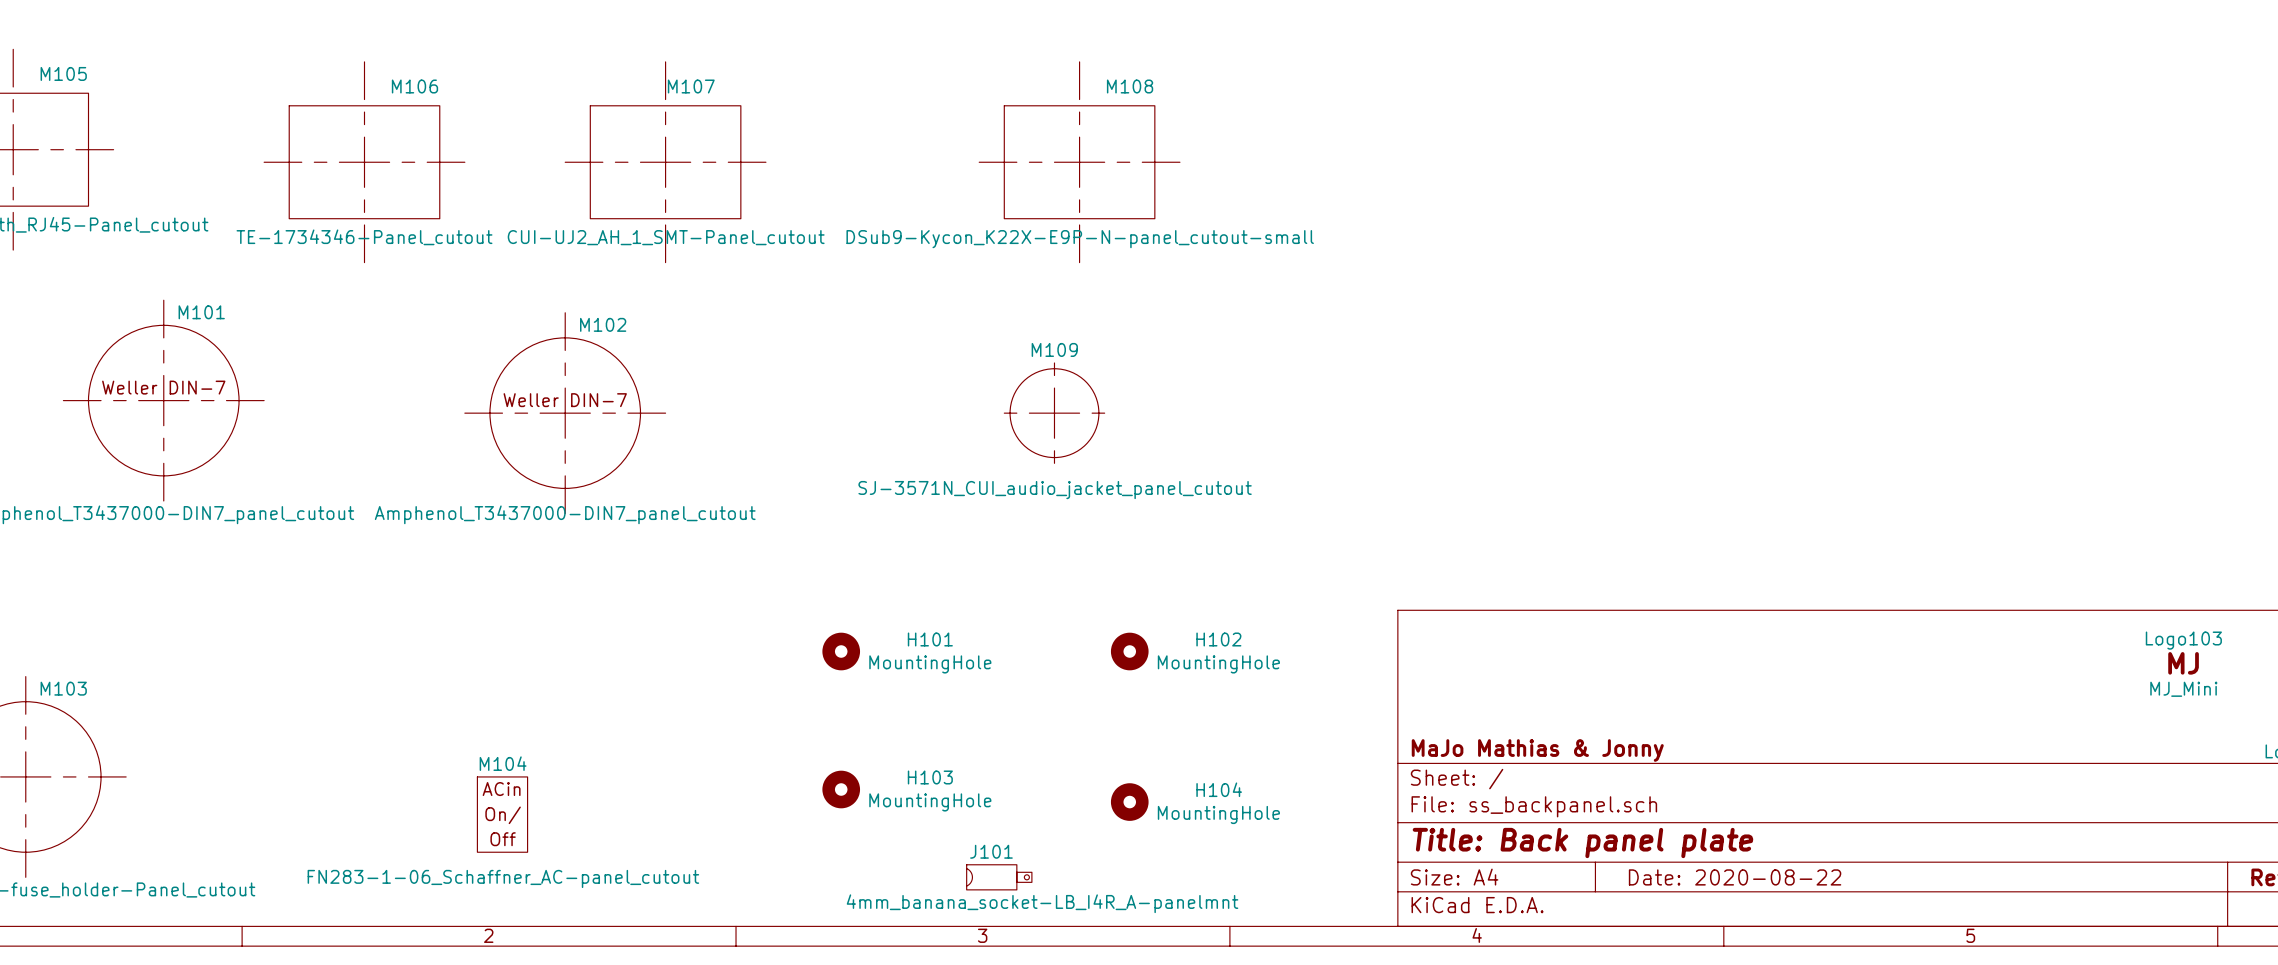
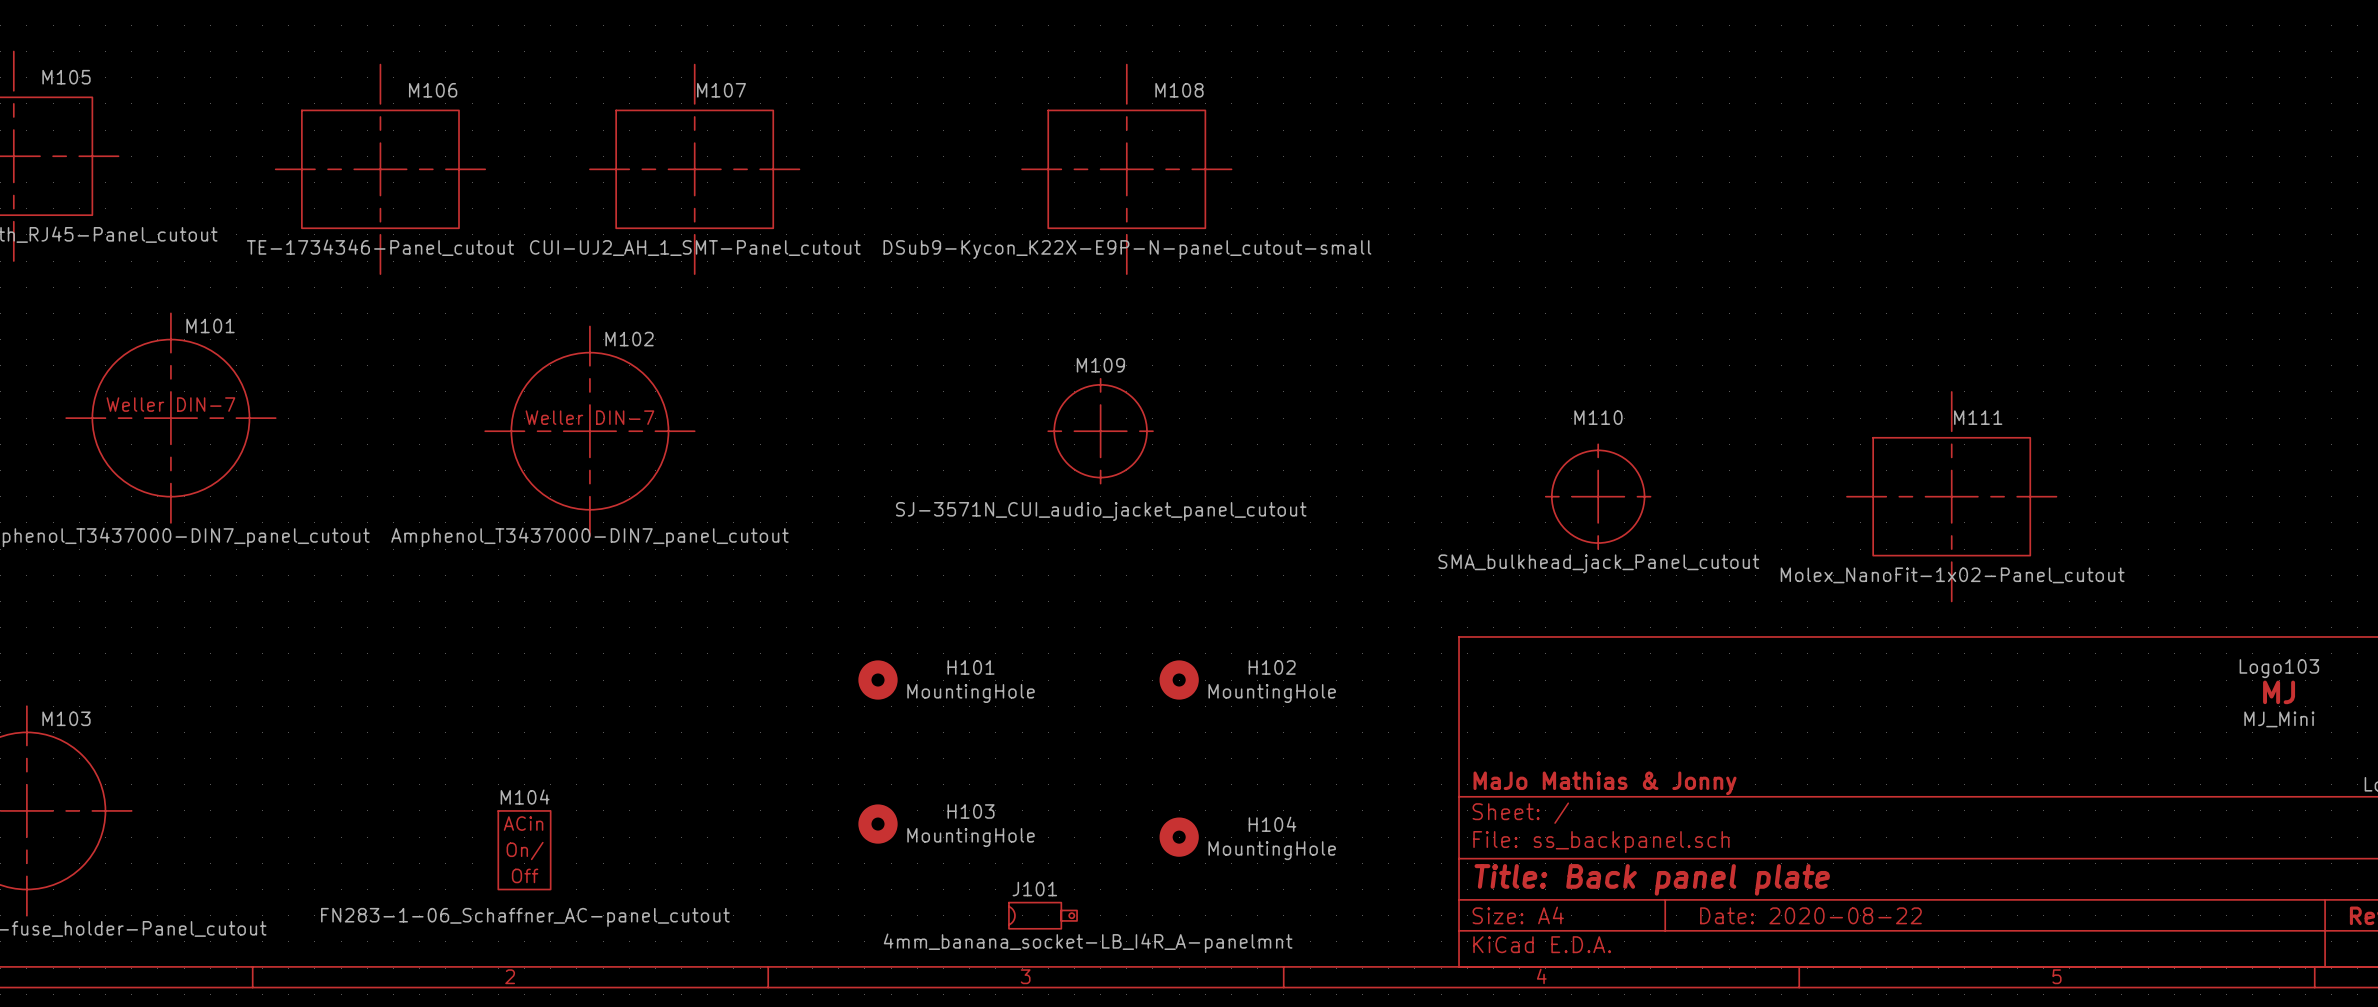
M110: none -> SMA_bulkhead_jack_Panel_cutout (1598, 496)
M111: none -> Molex_NanoFit-1x02-Panel_cutout (1951, 496)

